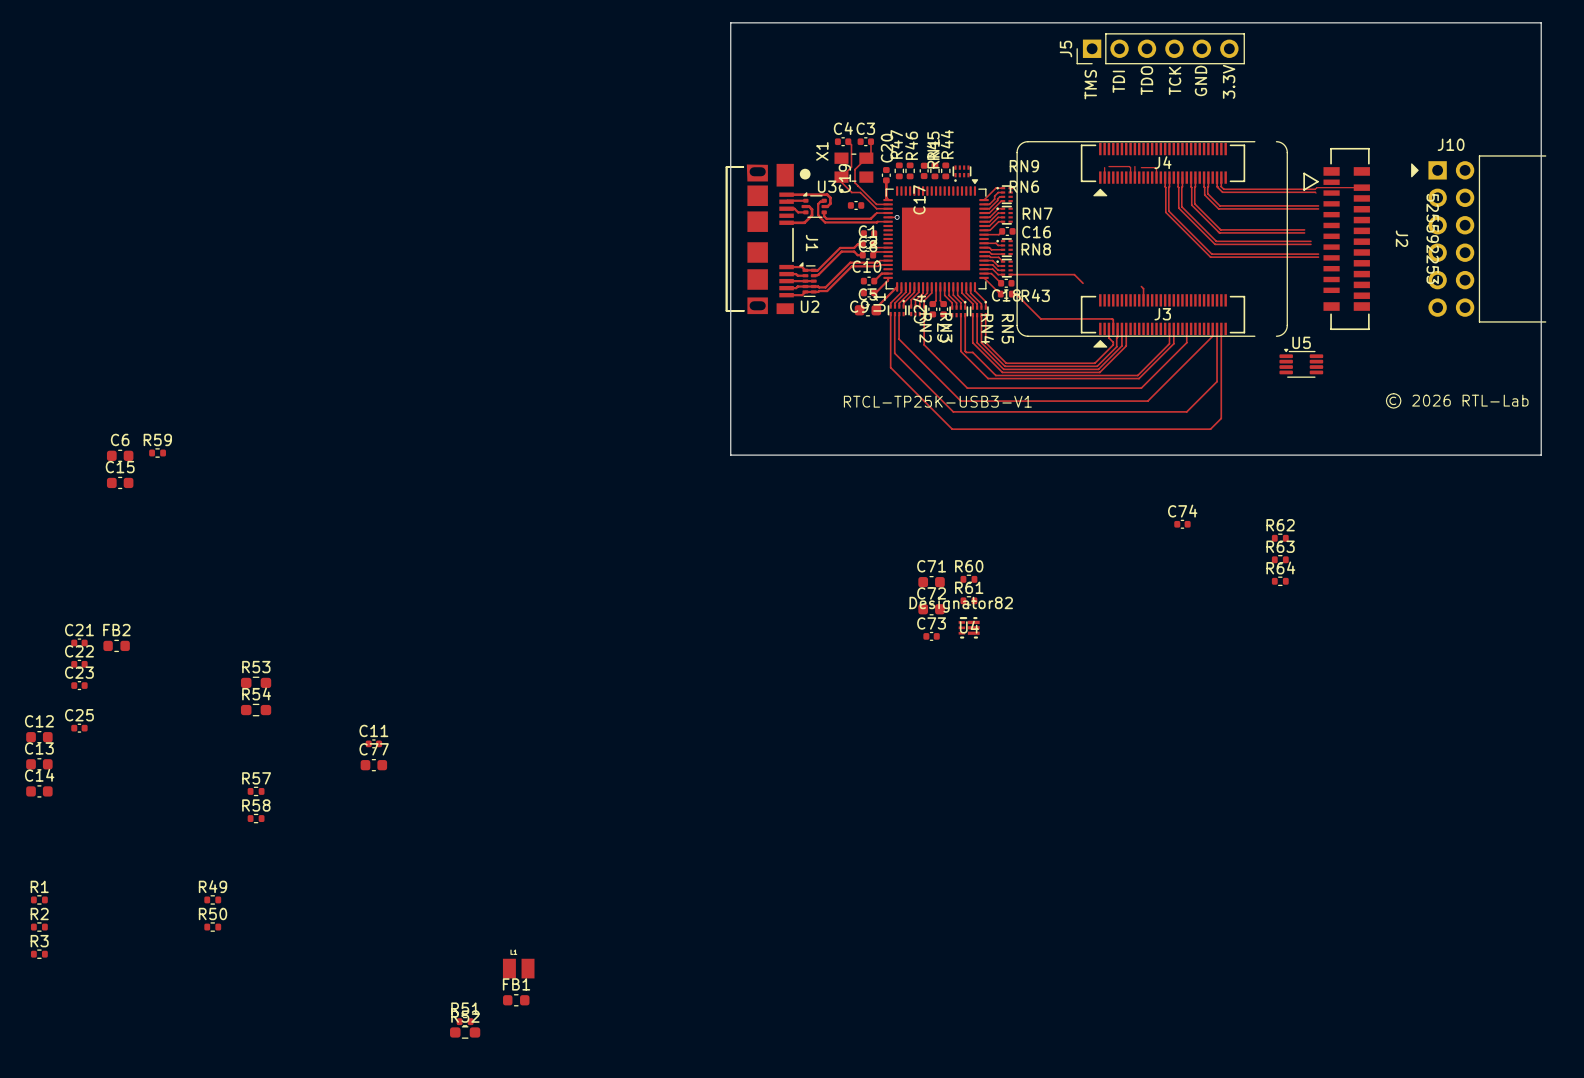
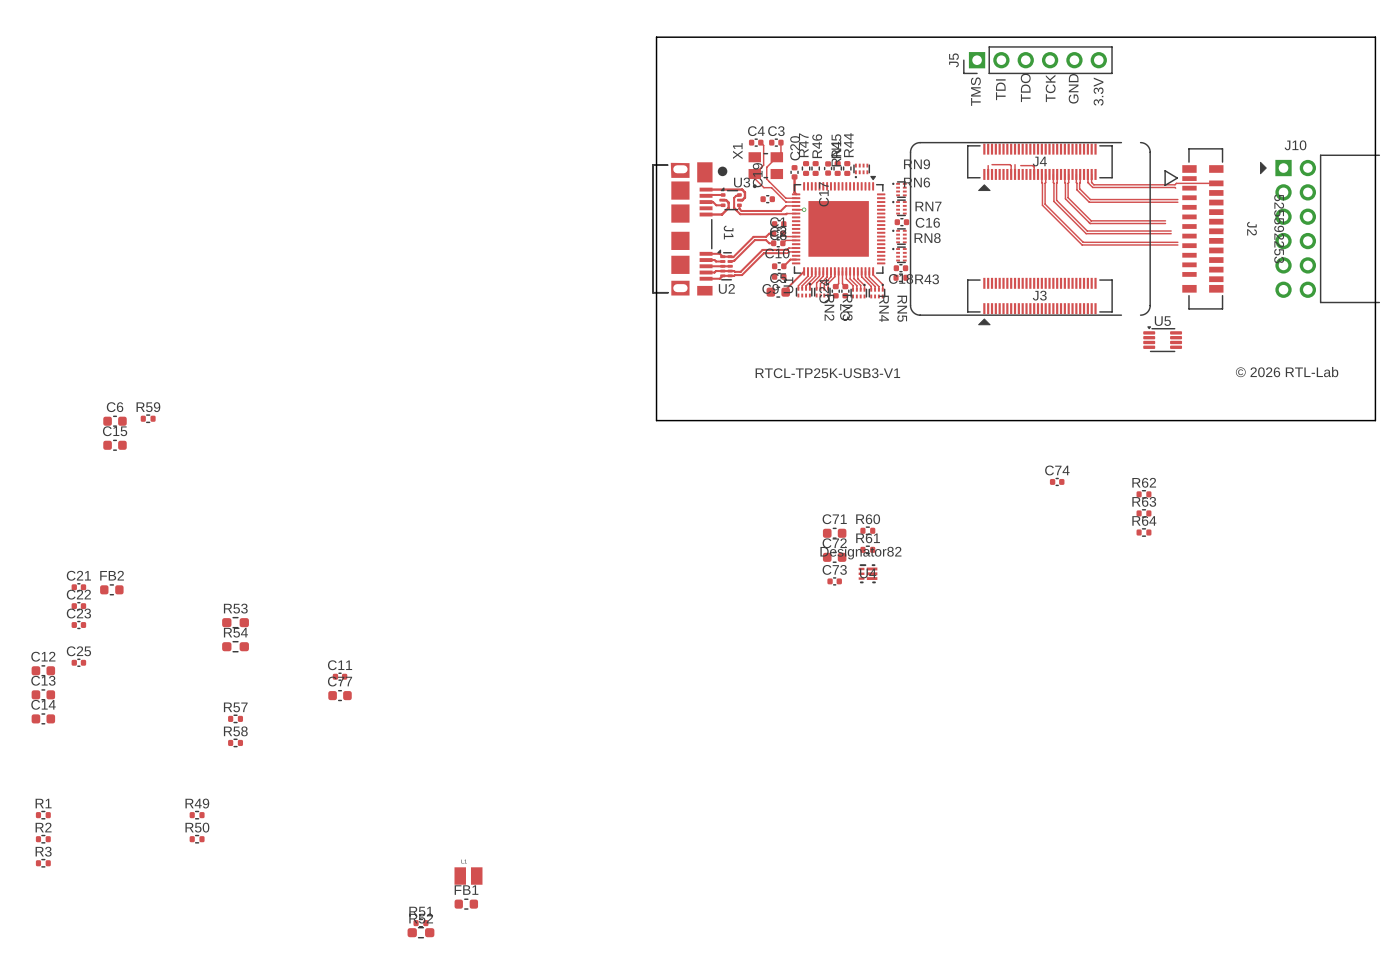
track: (1003, 188) (995, 188) (984, 200) -> none
track: (1003, 192) (998, 192) (989, 204) (984, 204) -> none
track: (1003, 196) (999, 196) (989, 208) (984, 208) -> none
track: (1003, 201) (989, 213) (984, 213) -> none
track: (1003, 208) (998, 208) (989, 217) (984, 217) -> none
track: (1003, 213) (998, 213) (989, 221) (984, 221) -> none
track: (1003, 217) (998, 217) (989, 226) (984, 226) -> none
track: (1003, 221) (998, 221) (990, 230) (984, 230) -> none
track: (1002, 231) (998, 234) (984, 234) -> none
track: (984, 243) (1003, 245) -> none
track: (984, 247) (1003, 249) -> none
track: (984, 251) (1003, 254) -> none
track: (984, 256) (998, 257) (1003, 261) -> none
track: (984, 260) (992, 260) (998, 265) (1003, 265) -> none
track: (984, 264) (992, 264) (998, 270) (1003, 270) -> none
track: (984, 269) (992, 269) (998, 274) (1003, 274) -> none
track: (984, 273) (991, 273) (1001, 283) -> none
track: (1010, 274) (1074, 274) (1083, 283) -> none
track: (888, 277) (888, 280) (874, 293) -> none
track: (984, 277) (1000, 294) -> none
track: (1141, 286) (1143, 288) (1143, 300) -> none
track: (1011, 294) (1016, 294) (1040, 318) (1112, 318) (1113, 328) -> none
track: (894, 313) (894, 353) (953, 411) (1186, 411) (1217, 381) (1217, 328) -> none
track: (890, 314) (890, 367) (952, 429) (1210, 429) (1221, 418) (1221, 334) -> none
track: (924, 314) (924, 344) (967, 388) (1141, 388) (1186, 342) (1186, 328) -> none
track: (899, 315) (899, 339) (960, 401) (1147, 401) (1212, 336) (1212, 328) -> none
track: (960, 315) (960, 351) (988, 378) (1139, 378) (1173, 343) (1173, 328) -> none
track: (965, 315) (965, 351) (972, 352) (995, 375) (1137, 375) (1169, 343) (1169, 328) -> none
track: (972, 315) (972, 342) (1002, 372) (1099, 372) (1126, 345) (1126, 328) -> none
track: (977, 315) (977, 342) (1003, 369) (1098, 369) (1121, 345) (1121, 328) -> none
track: (981, 315) (981, 342) (1005, 366) (1097, 366) (1116, 346) (1117, 328) -> none
track: (985, 315) (985, 342) (1006, 363) (1094, 363) (1113, 344) (1108, 337) (1108, 328) -> none

